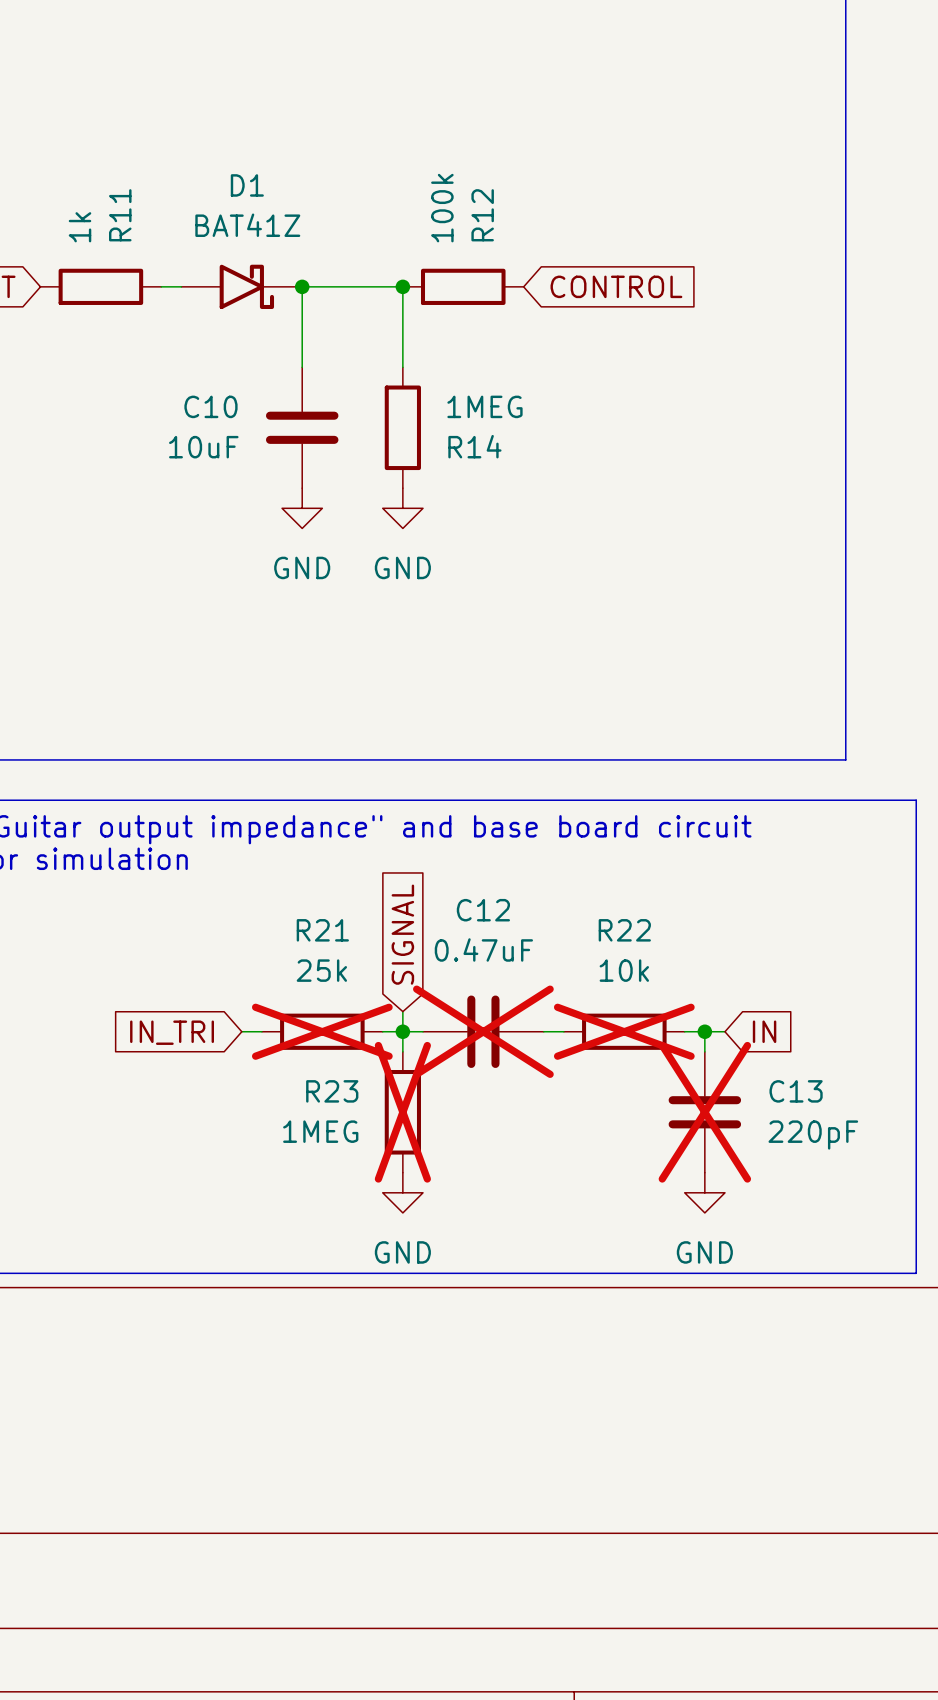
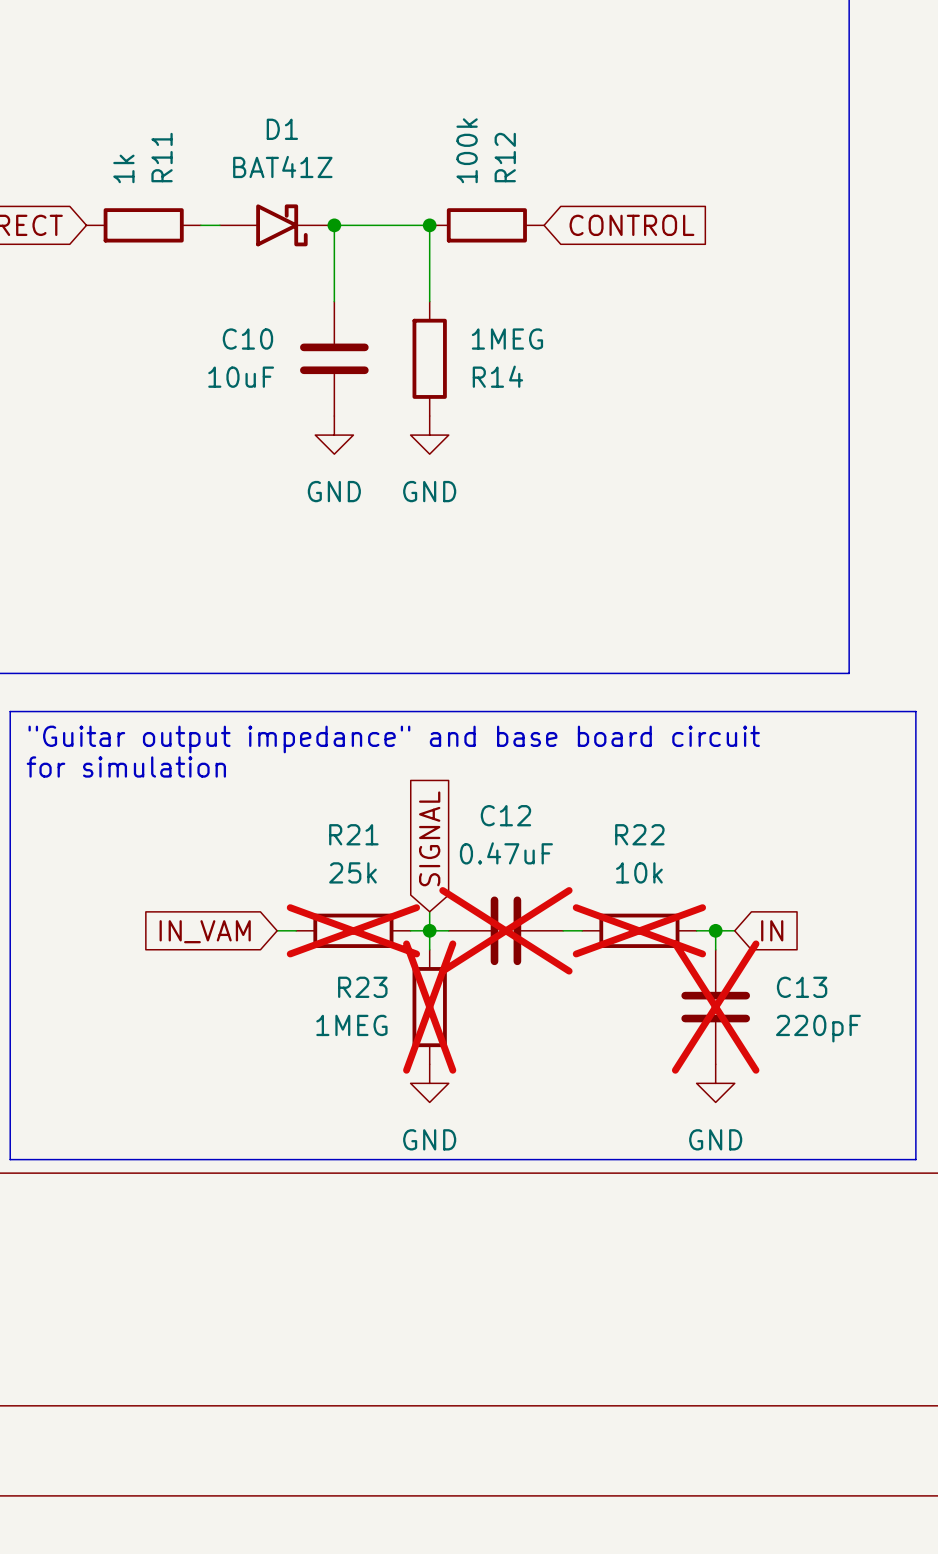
global label: IN_TRI (172, 1032) -> IN_VAM (205, 931)

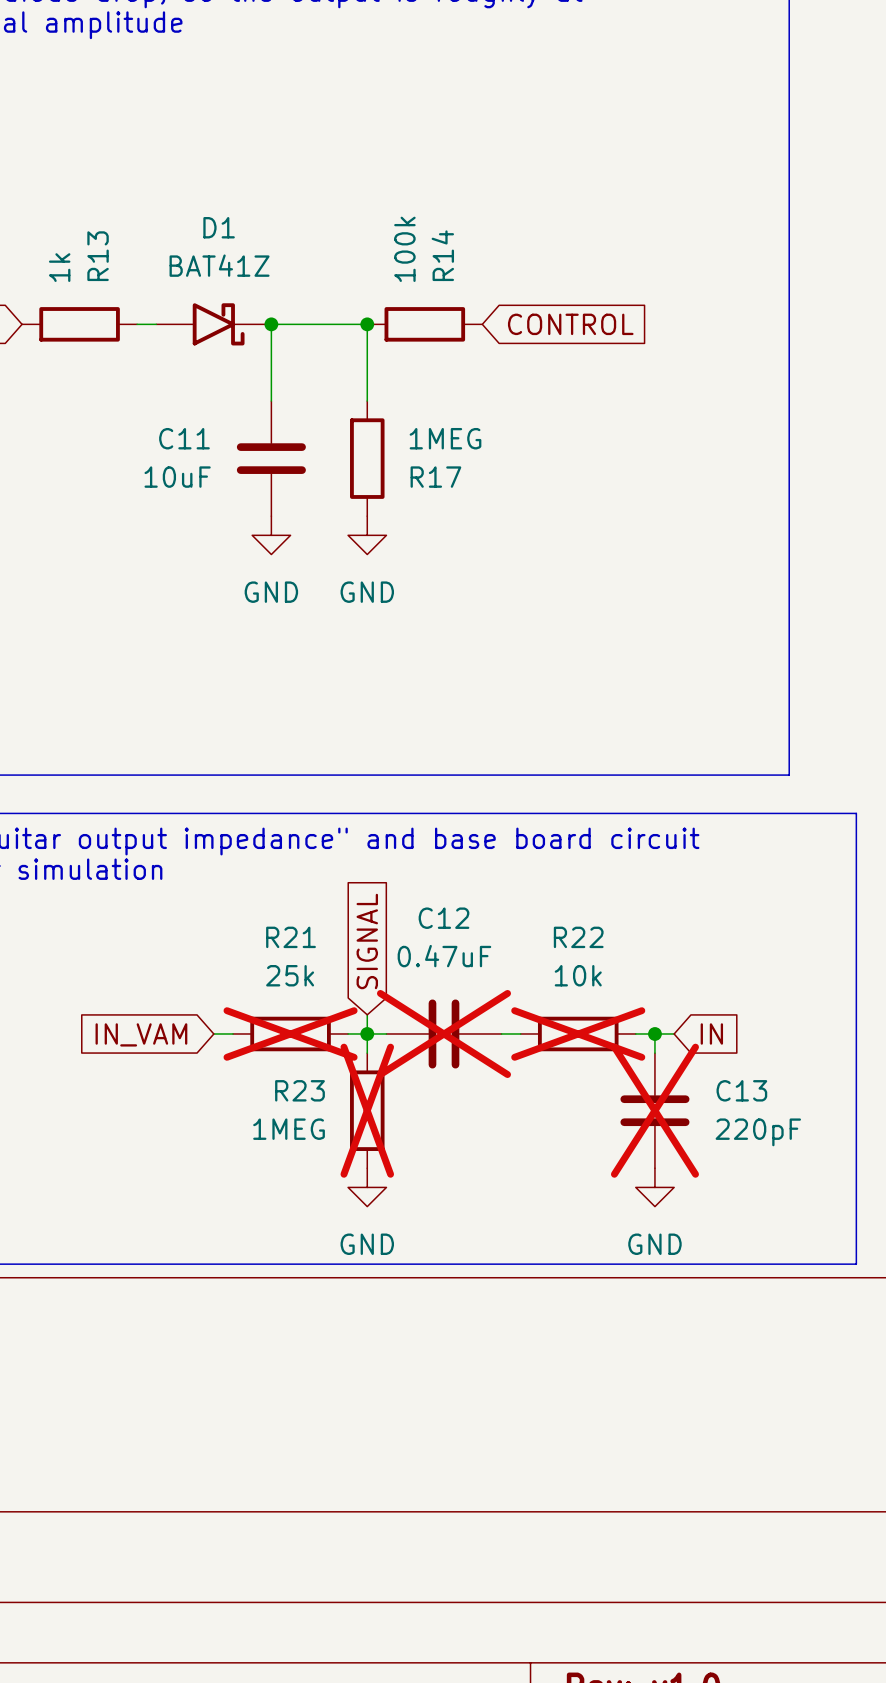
R11 name: R11 (162, 157) -> R13 (98, 256)
R12 name: R12 (505, 157) -> R14 (442, 255)
C10 name: C10 (247, 339) -> C11 (184, 438)
R14 name: R14 (497, 376) -> R17 (435, 477)

